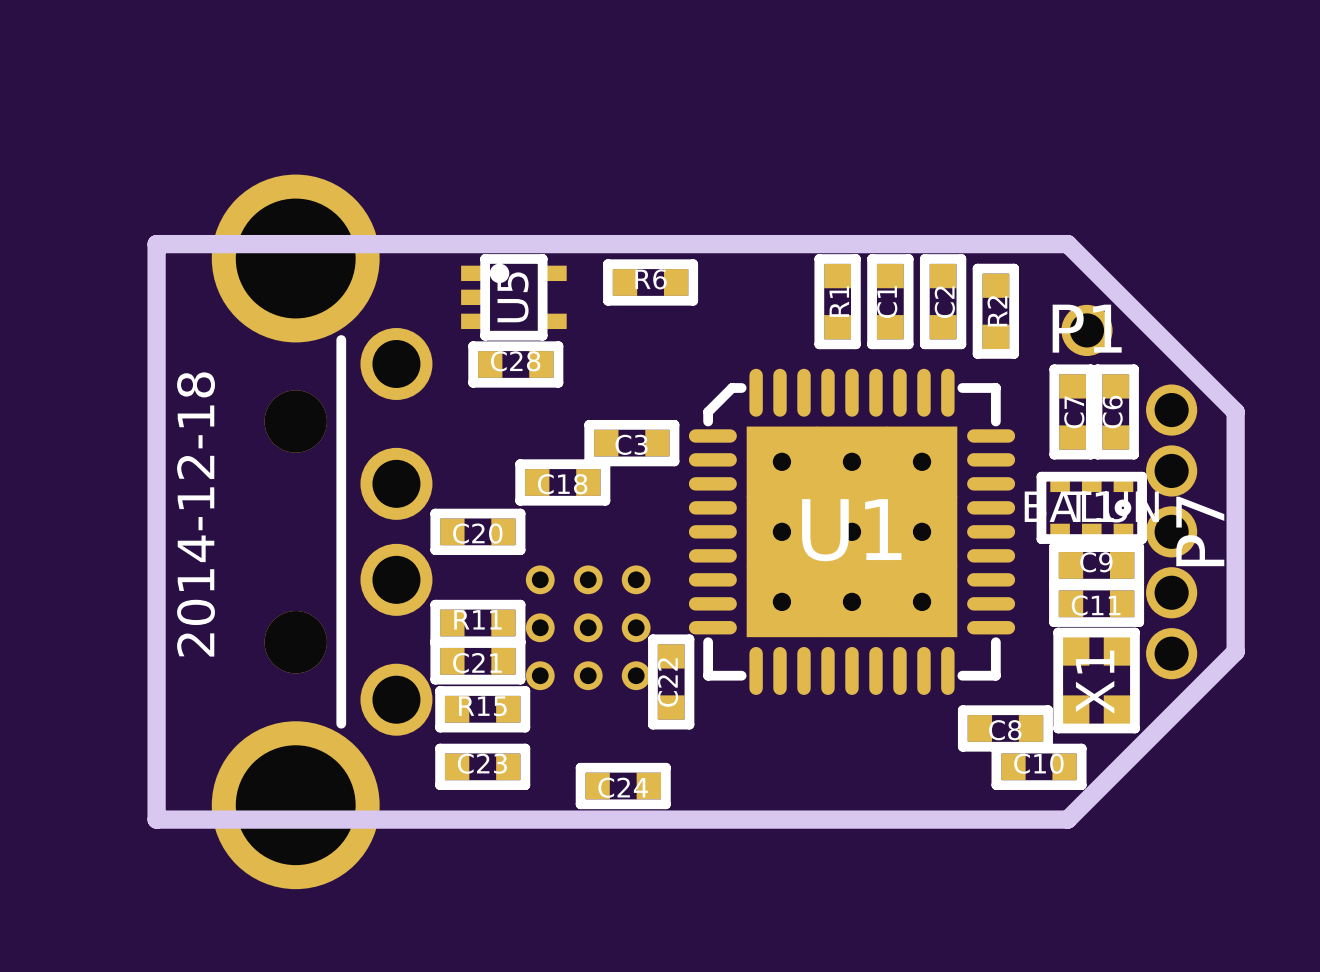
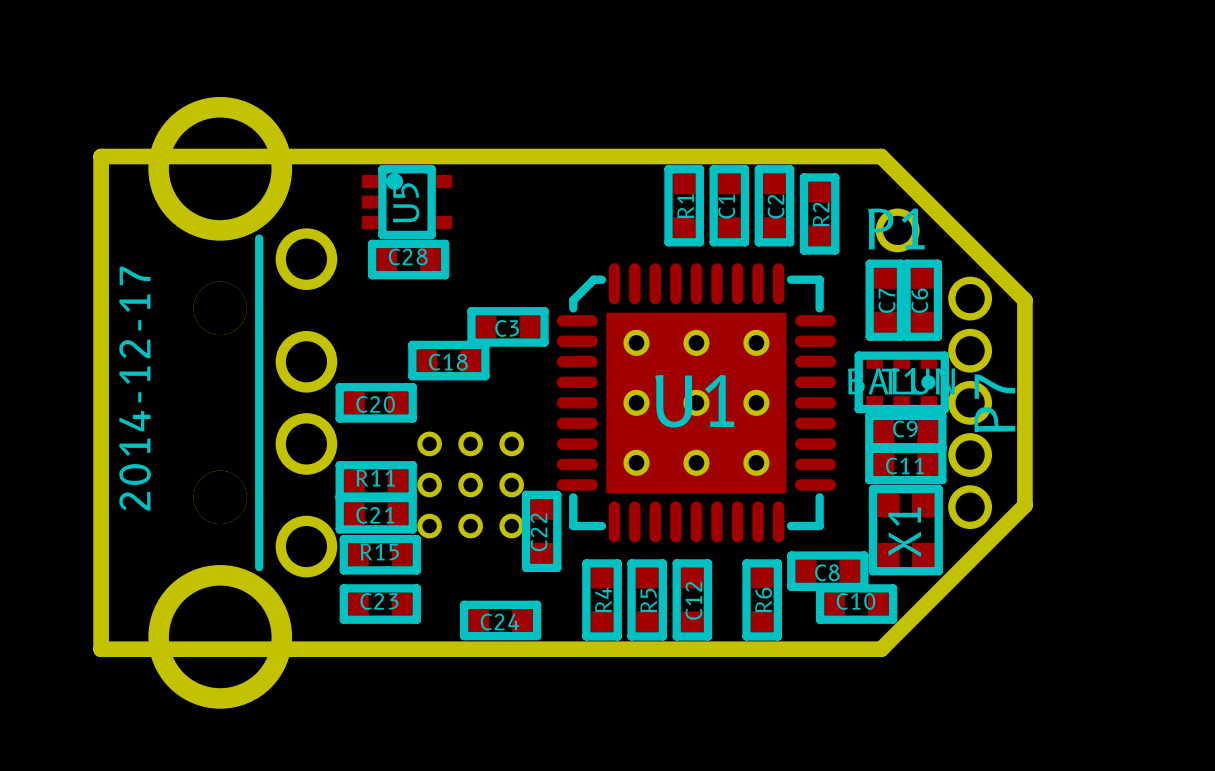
R6 rotation: 0° (650, 282) -> 90° clockwise (762, 599)
R6 position: (650, 282) -> (762, 599)
text: 2014-12-18 (196, 514) -> 2014-12-17 (135, 388)
R4: none -> (602, 599)
R5: none -> (647, 599)
C12: none -> (692, 599)

